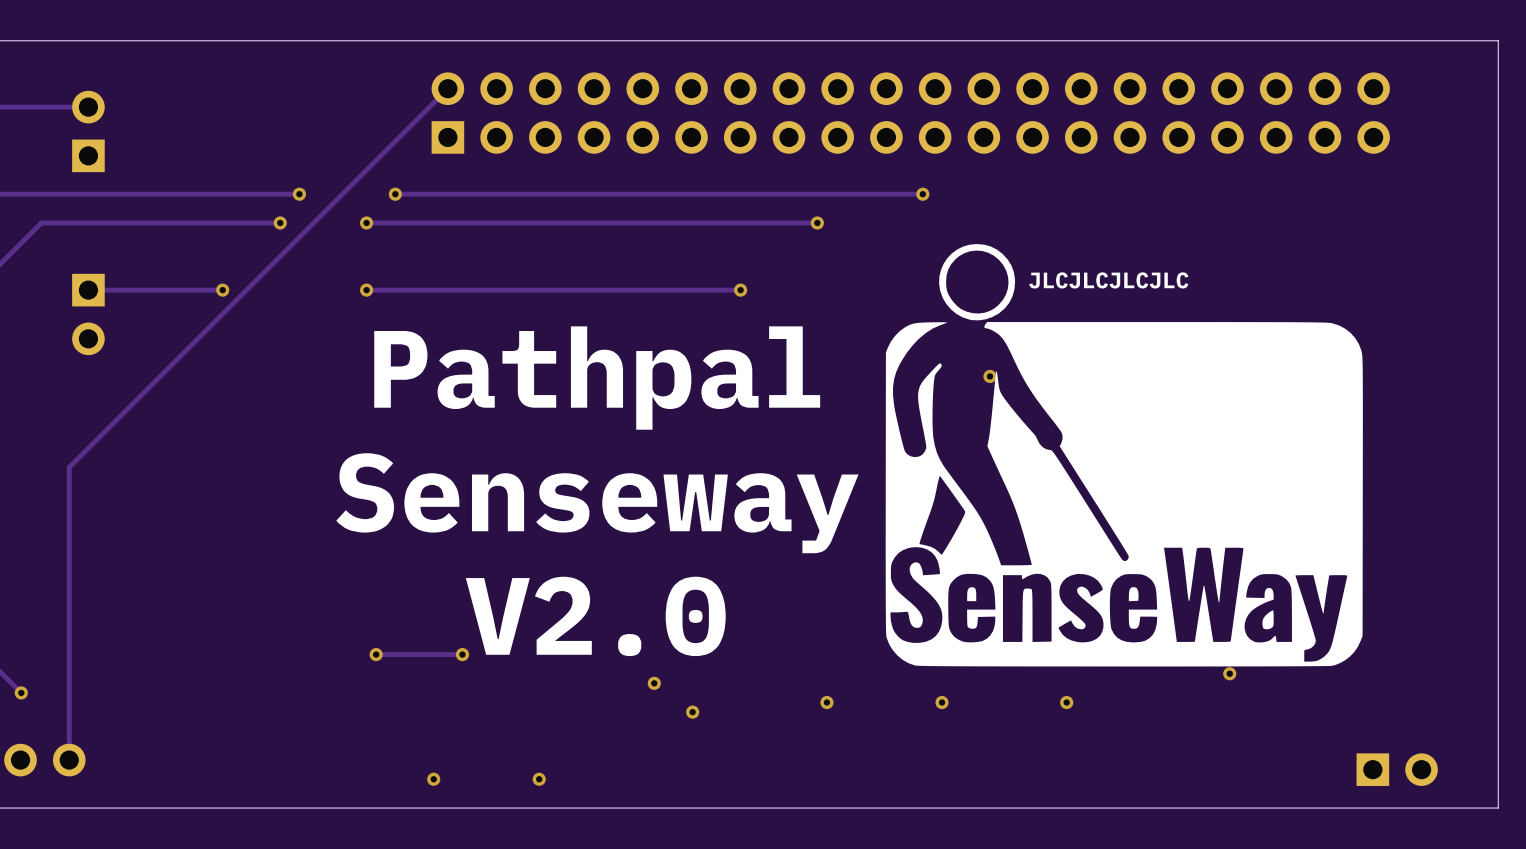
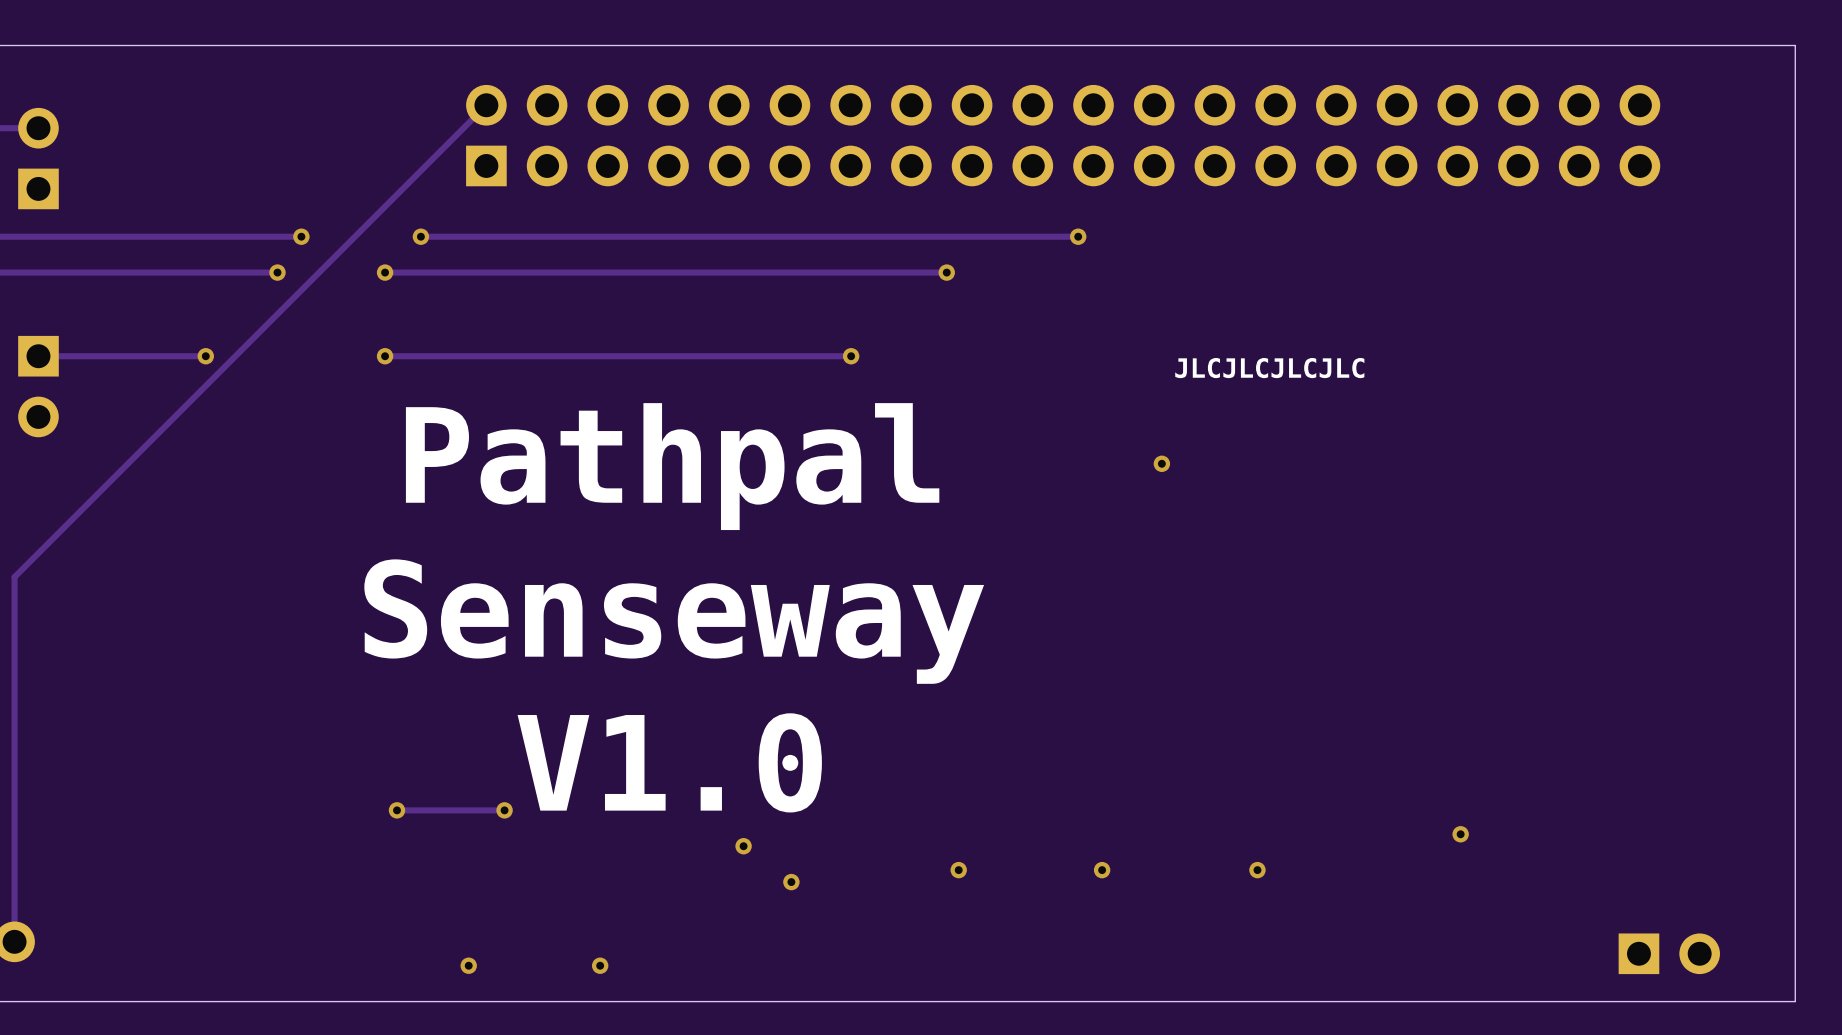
drawing: [885, 244, 1363, 667] -> none
text position: JLCJLCJLCJLC (1108, 280) -> JLCJLCJLCJLC (1269, 368)
text: V2.0 (595, 616) -> V1.0 (669, 762)

